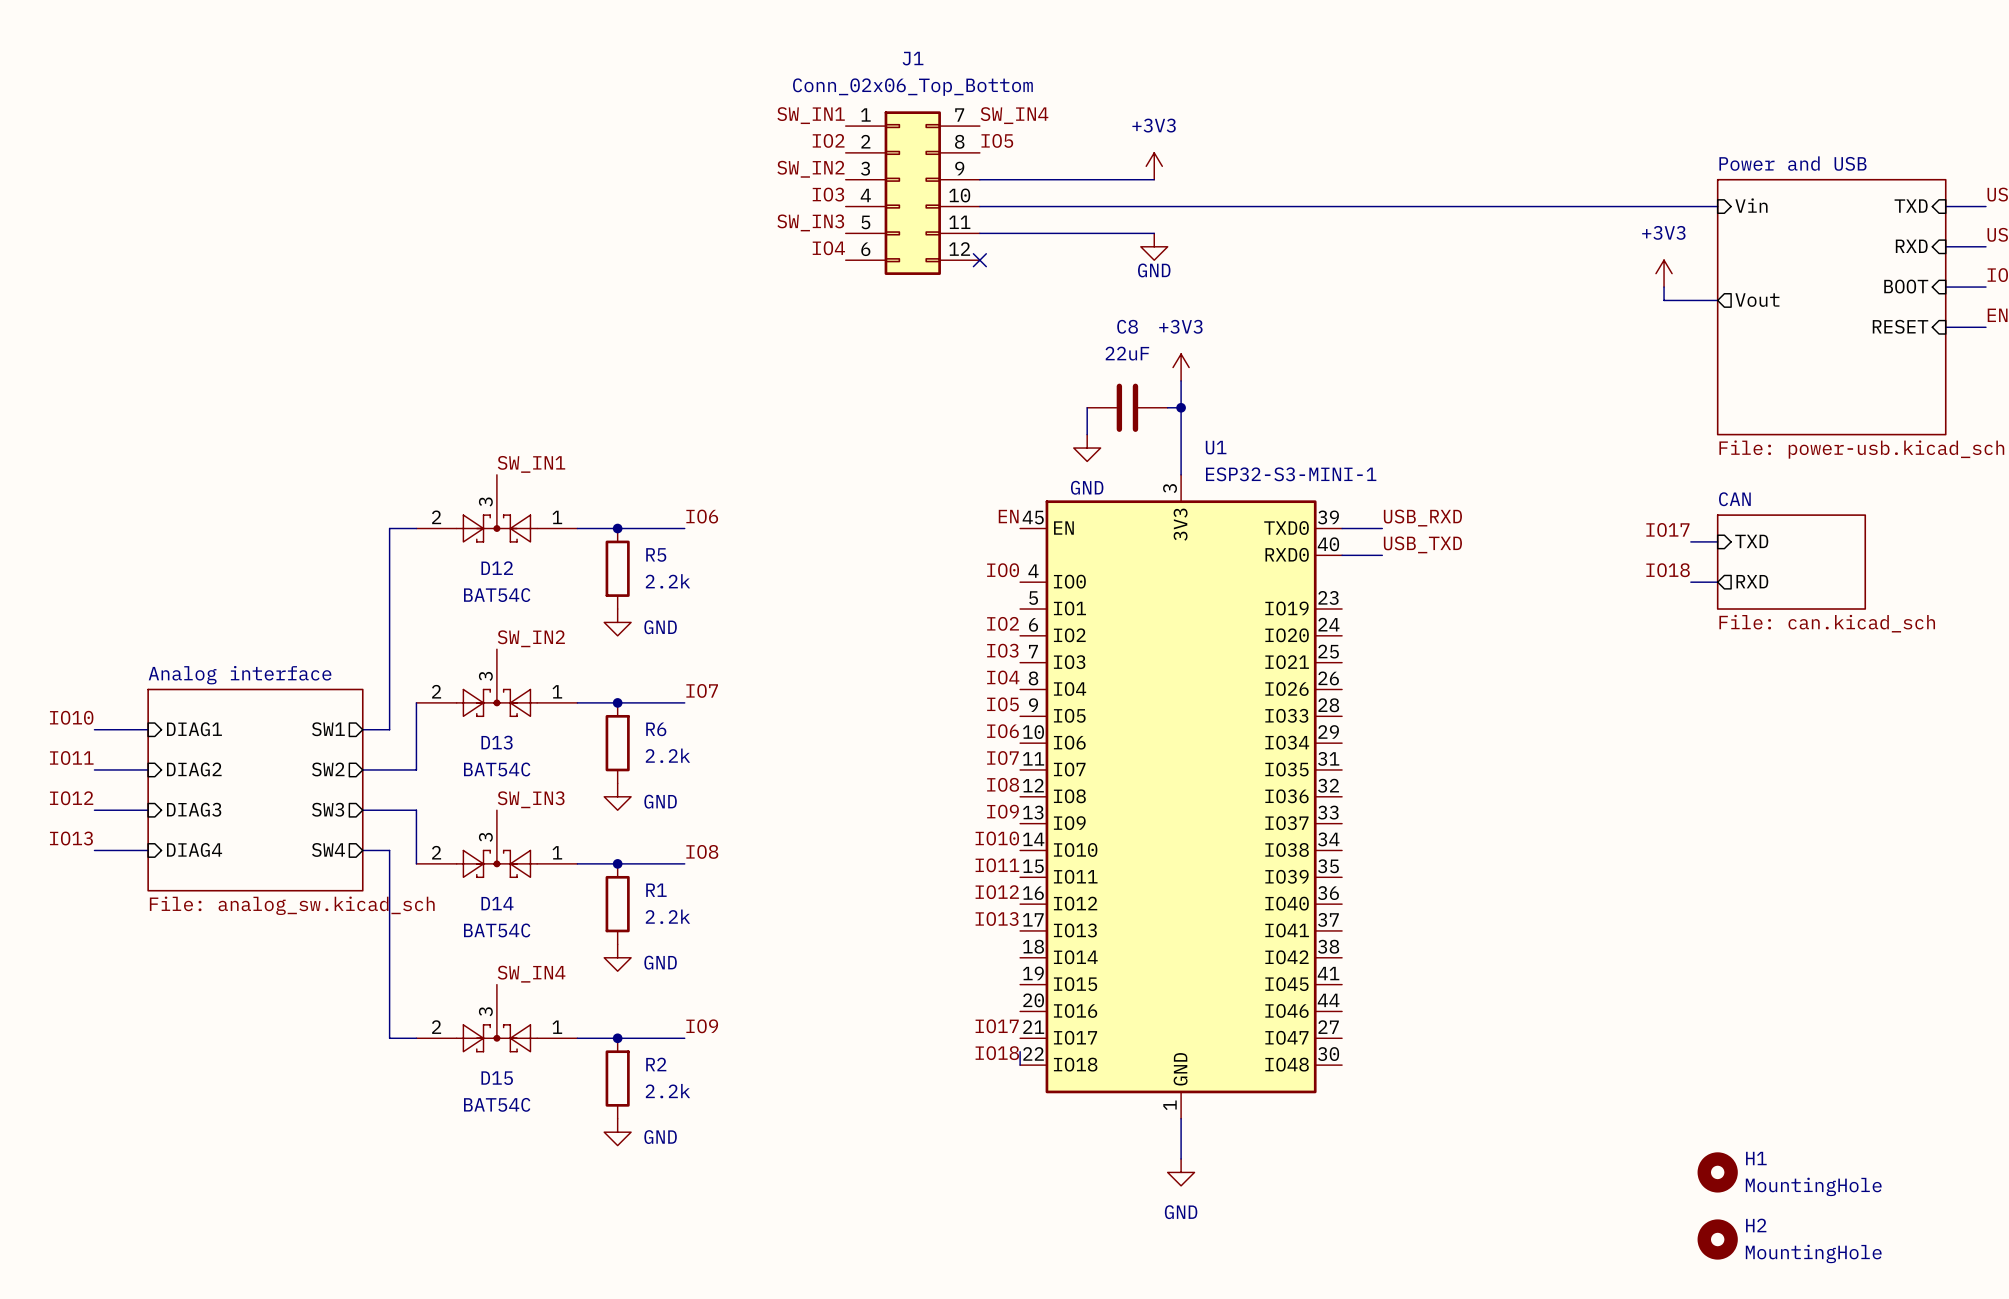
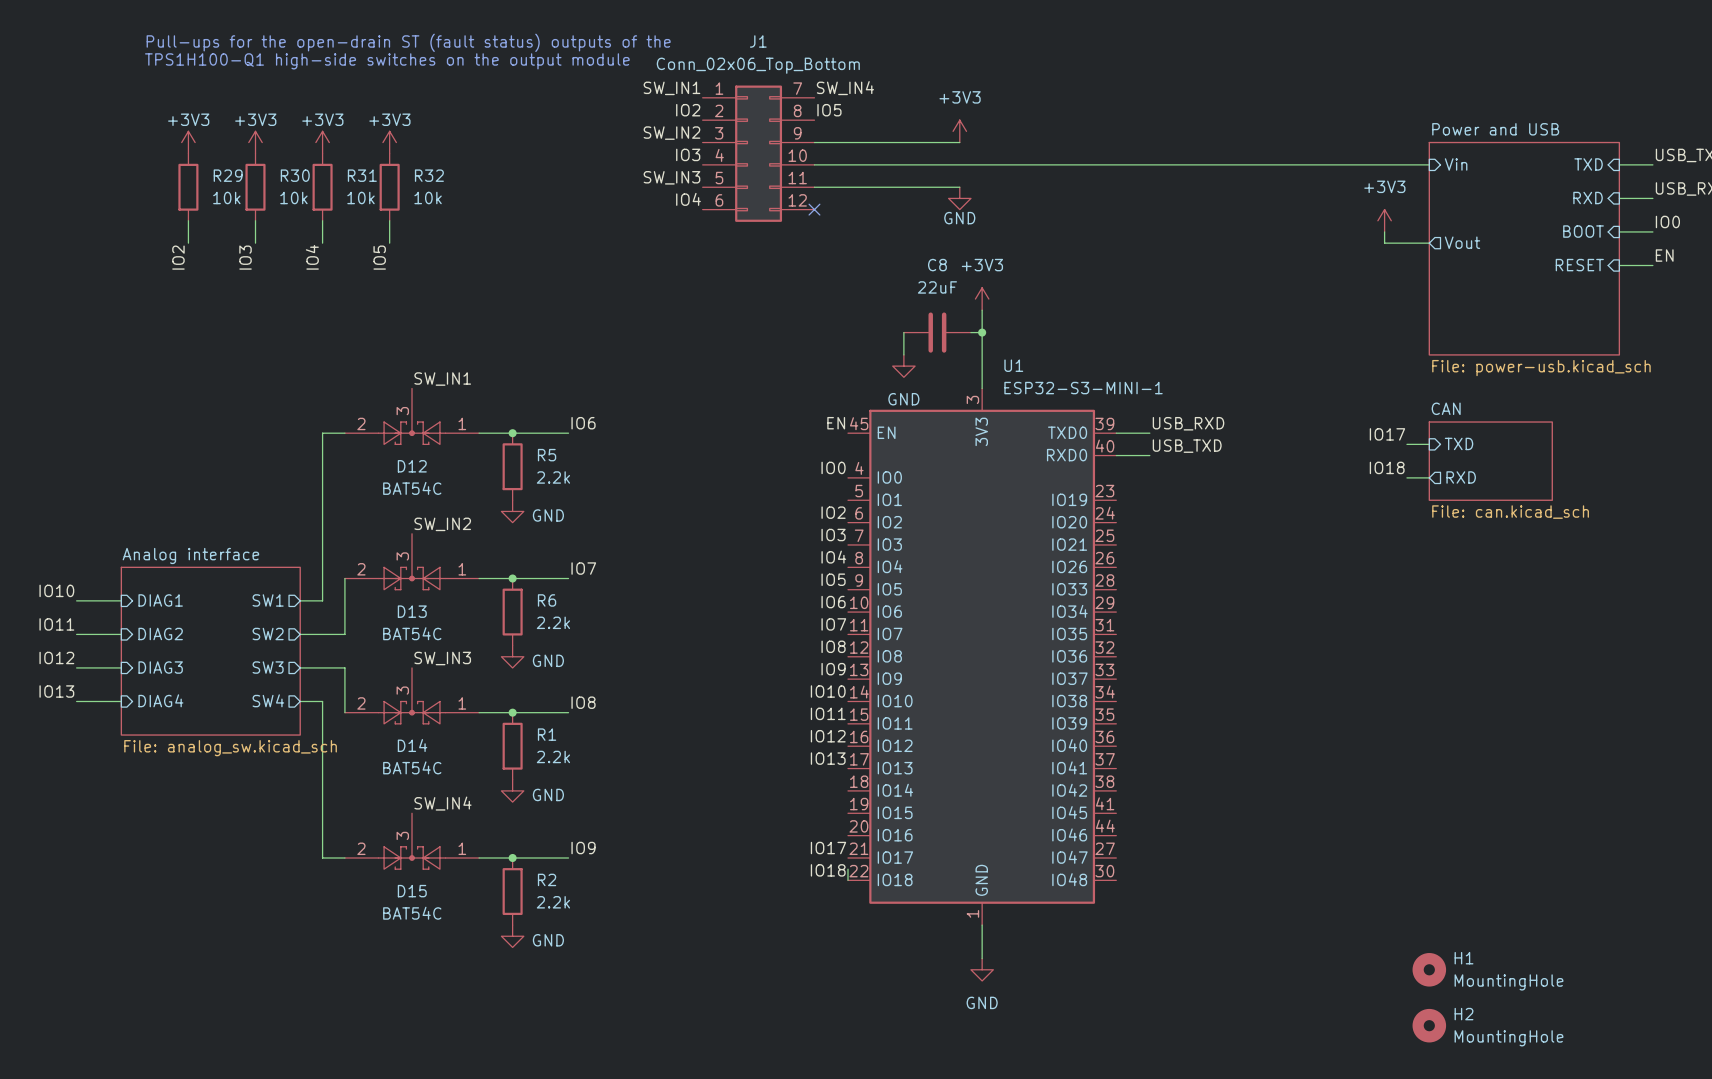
text: none -> Pull-ups for the open-drain ST (fault status) outputs of the (408, 42)
text: none -> TPS1H100-Q1 high-side switches on the output module (387, 61)
power symbol: none -> +3V3 (188, 142)
power symbol: none -> +3V3 (255, 142)
power symbol: none -> +3V3 (322, 142)
power symbol: none -> +3V3 (389, 142)
R29: none -> 10k (188, 187)
R30: none -> 10k (255, 187)
R31: none -> 10k (322, 187)
R32: none -> 10k (389, 187)
wire: none -> (188, 220) (188, 243)
wire: none -> (255, 220) (255, 243)
wire: none -> (322, 220) (322, 243)
wire: none -> (389, 220) (389, 243)
label: none -> IO2 (178, 257)
label: none -> IO3 (245, 257)
label: none -> IO4 (312, 257)
label: none -> IO5 (379, 257)

